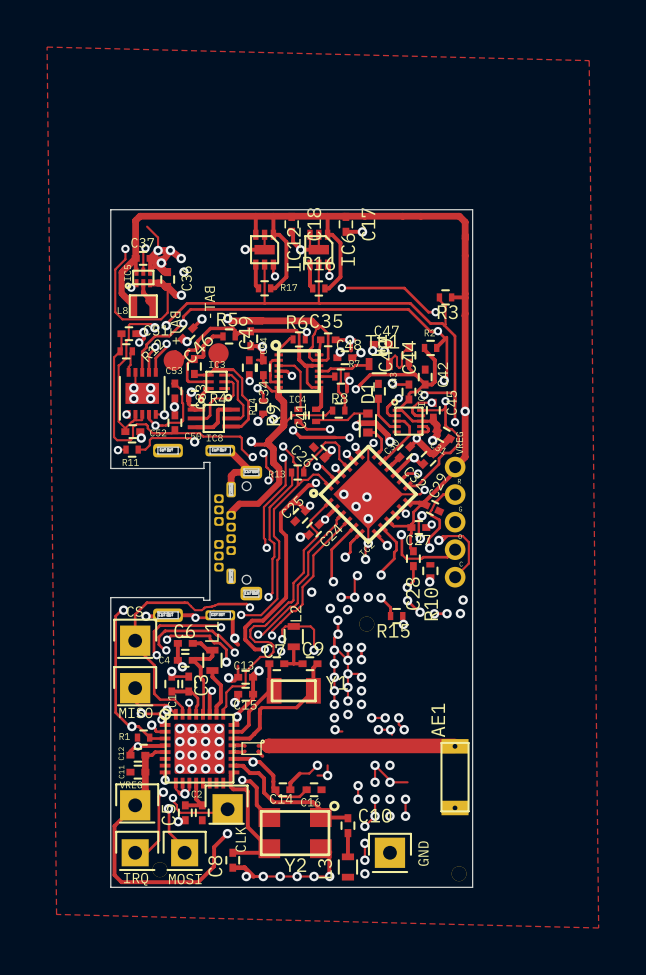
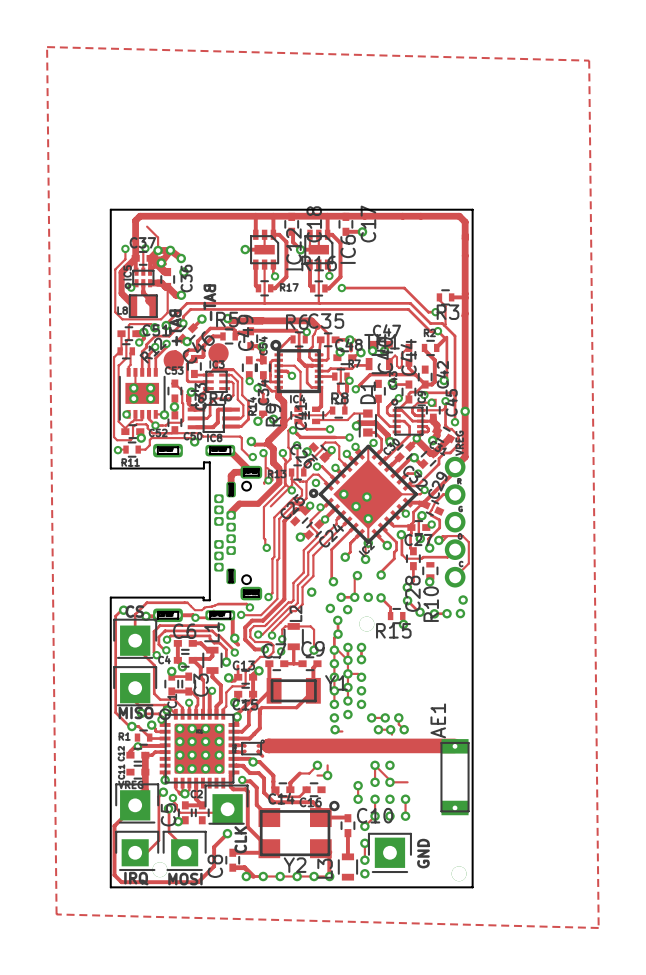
track: none -> (291, 427) (288, 430) (290, 459) (284, 464) (284, 483) (291, 490)
via: none -> (296, 445)
track: (283, 446) (293, 456) (293, 461) (297, 466) (298, 484) -> none
via: (283, 446) -> none
via: none -> (307, 451)
via: none -> (282, 453)
track: (265, 455) (267, 468) -> (265, 455) (264, 483)
via: (283, 457) -> none
track: (307, 479) (303, 479) (273, 509) (273, 536) (279, 541) -> (296, 445) (297, 479) (299, 481) (306, 481) (306, 498) (302, 502) (295, 502) (279, 518) (279, 541)
track: (315, 482) (313, 485) (308, 485) (280, 513) (280, 530) (286, 535) (286, 597) (284, 599) -> (304, 509) (296, 509) (284, 521) (284, 599)
via: none -> (291, 490)
track: (270, 506) (269, 539) (274, 543) -> (291, 472) (291, 479) (302, 489) (302, 495) (299, 498) (293, 498) (274, 517) (274, 543)
via: none -> (320, 507)

